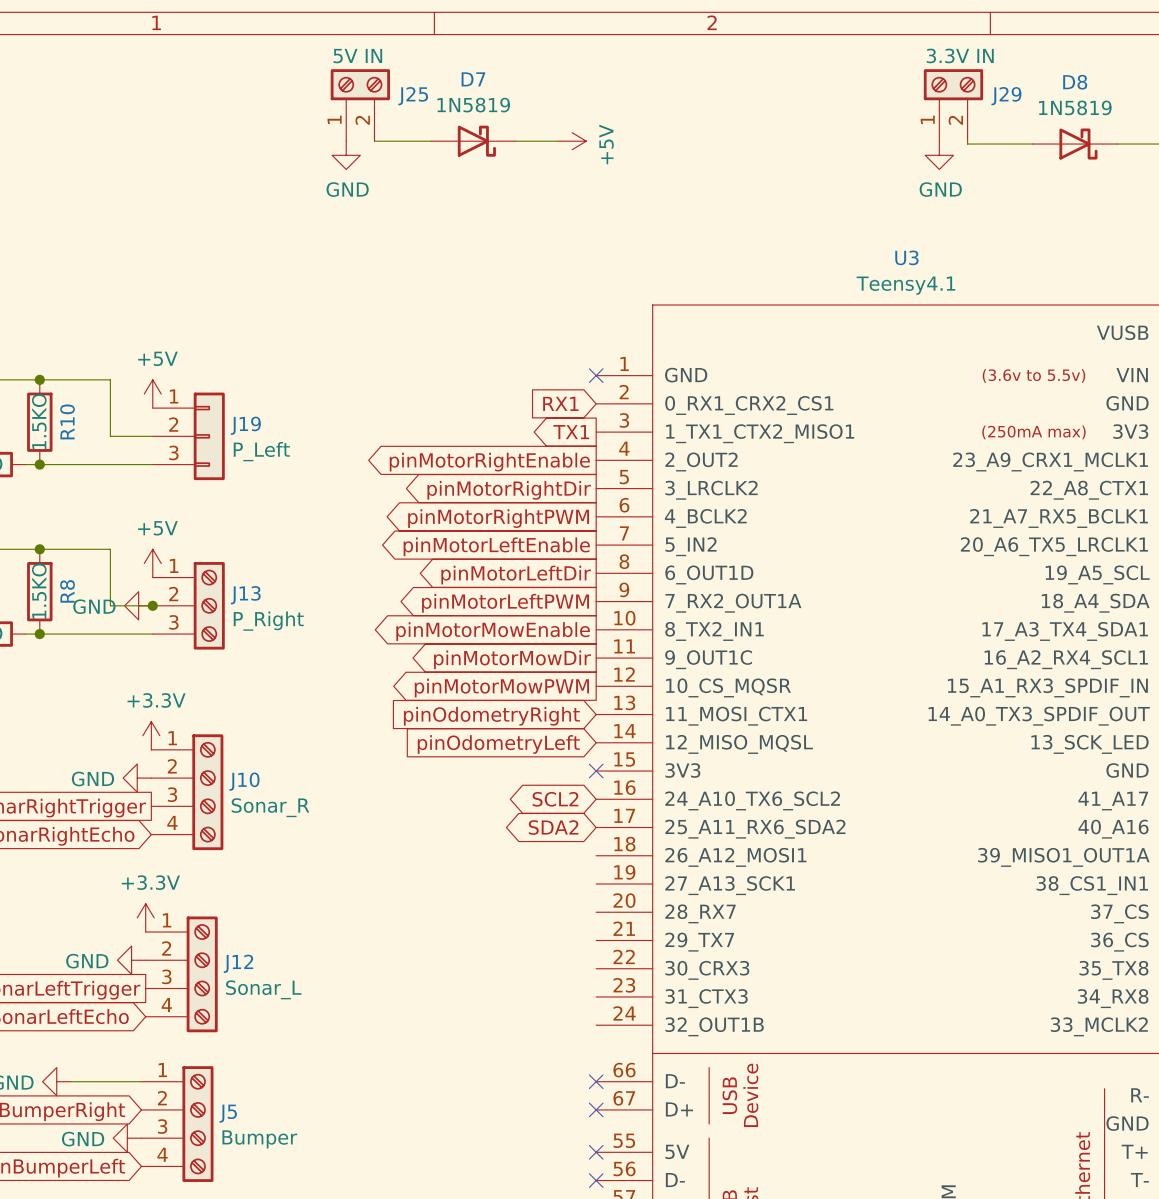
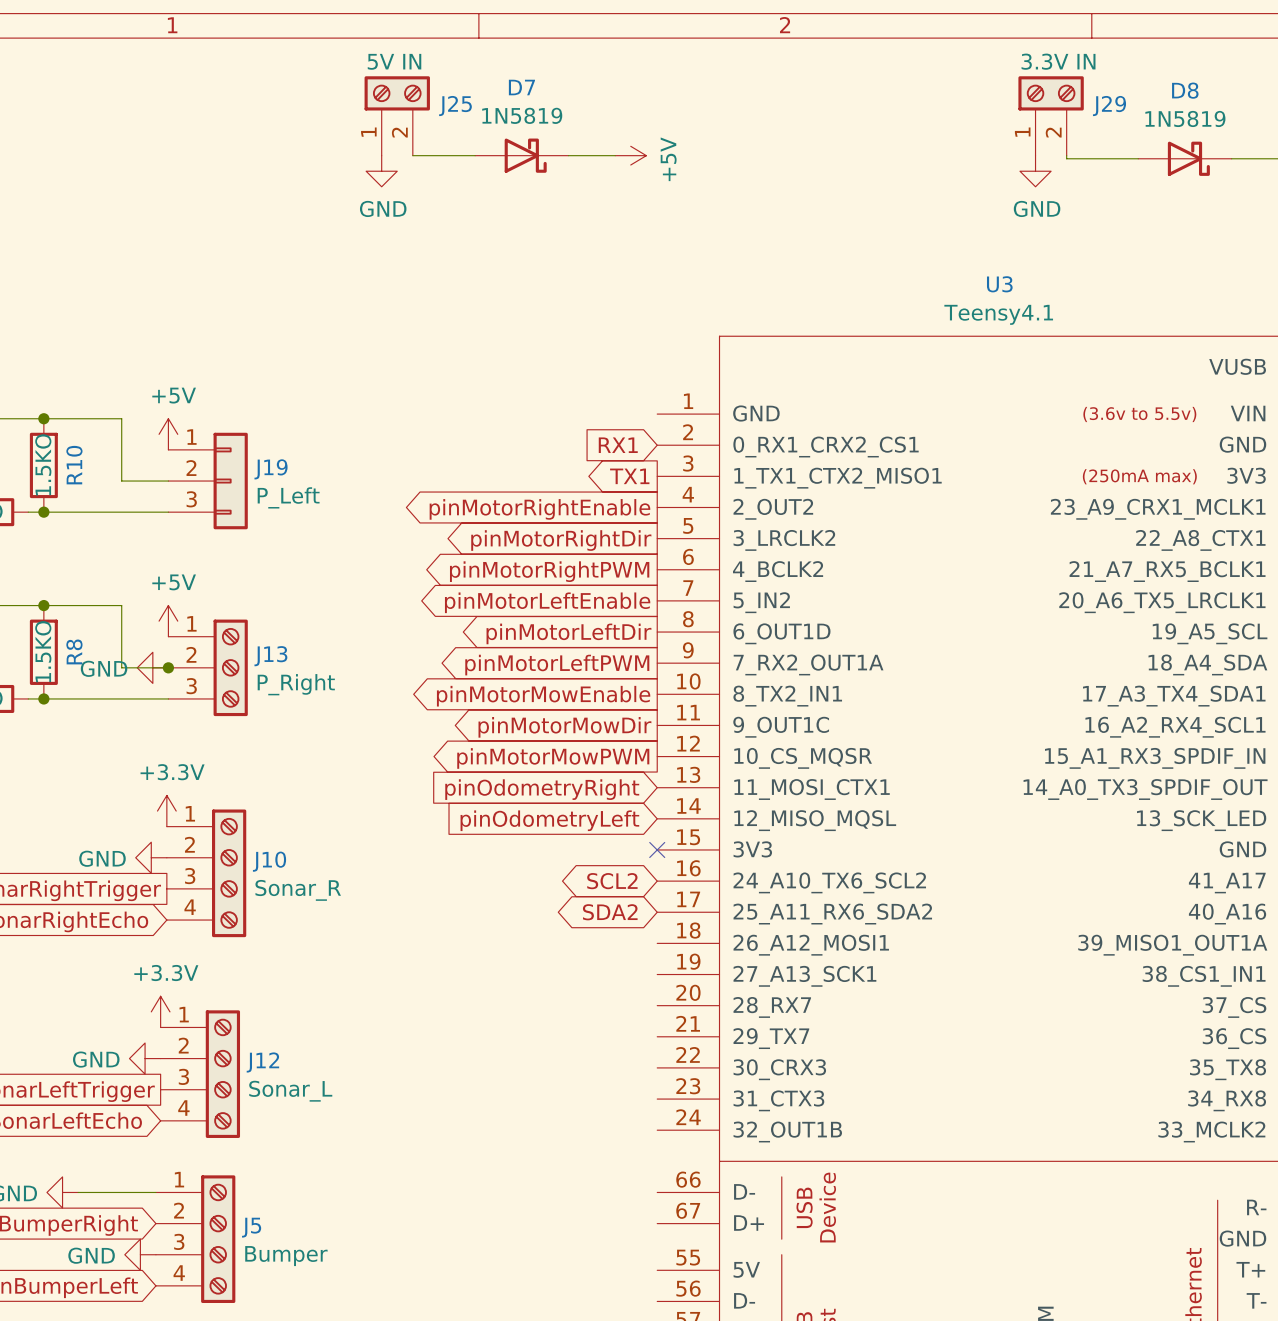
no-connect mark: (596, 375) -> none
no-connect mark: (596, 1081) -> none
no-connect mark: (596, 1109) -> none
no-connect mark: (596, 1152) -> none
no-connect mark: (596, 1180) -> none

